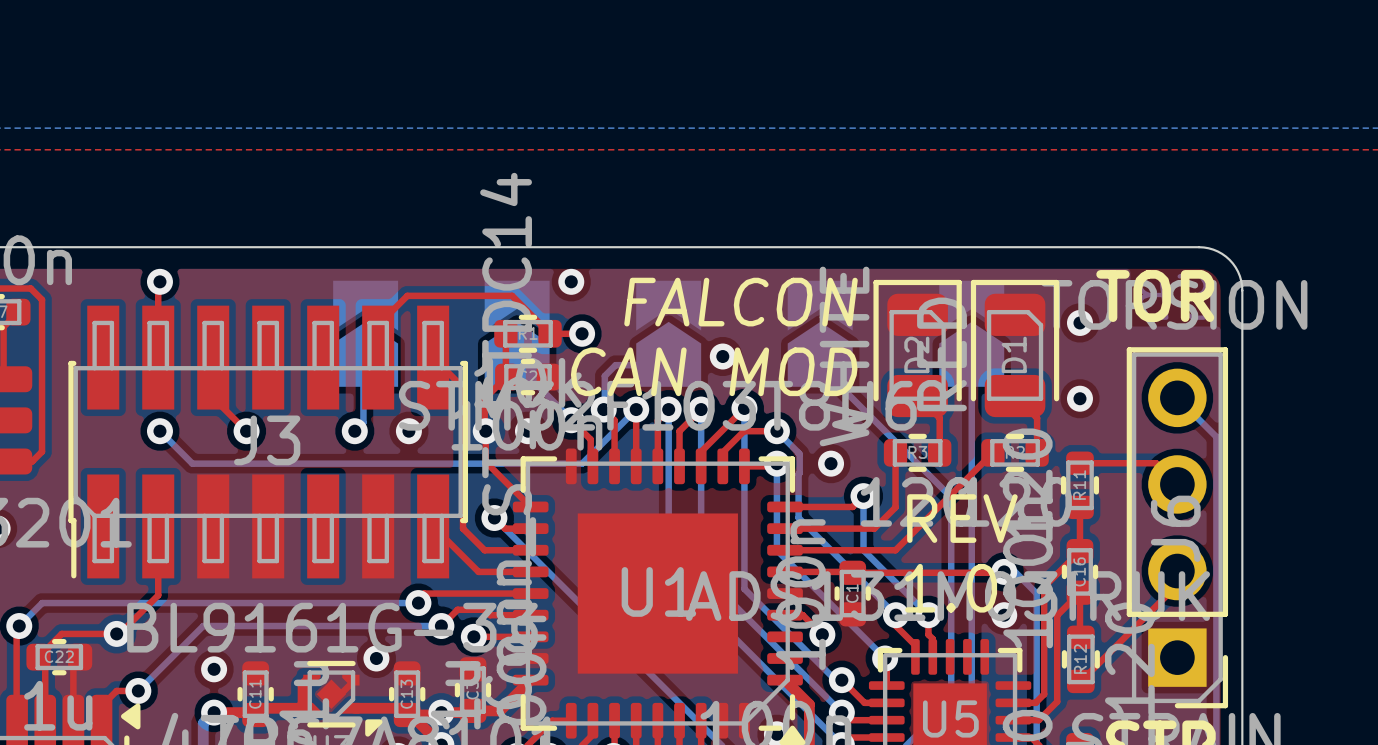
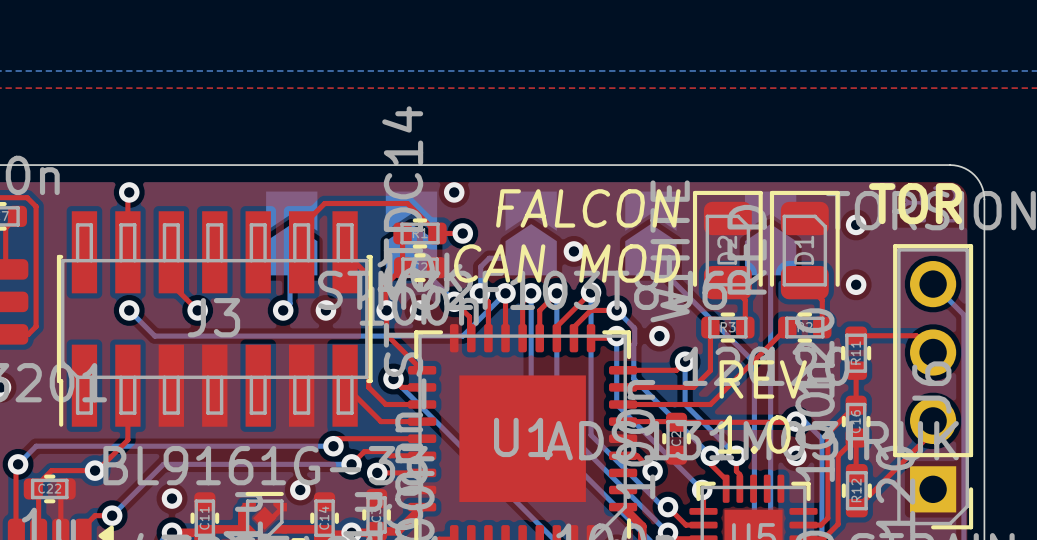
C1 name: C1 (852, 593) -> C2 (676, 438)
C13 name: C13 (406, 694) -> C14 (324, 518)

